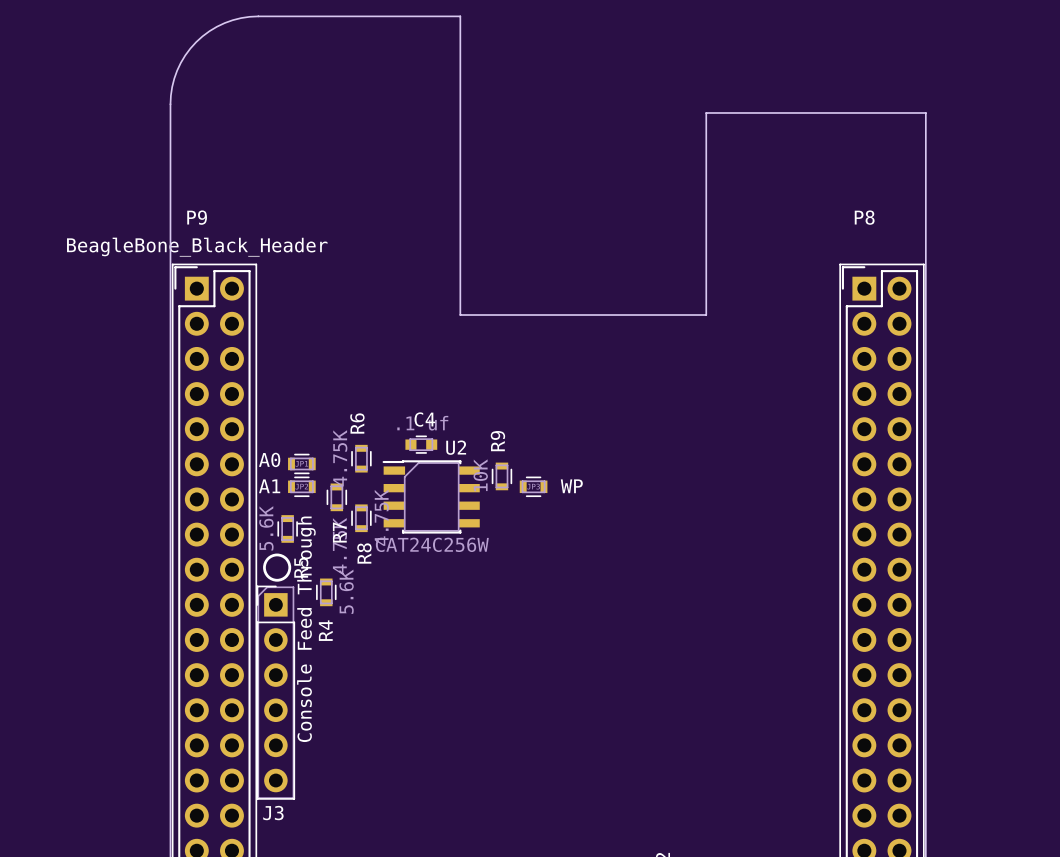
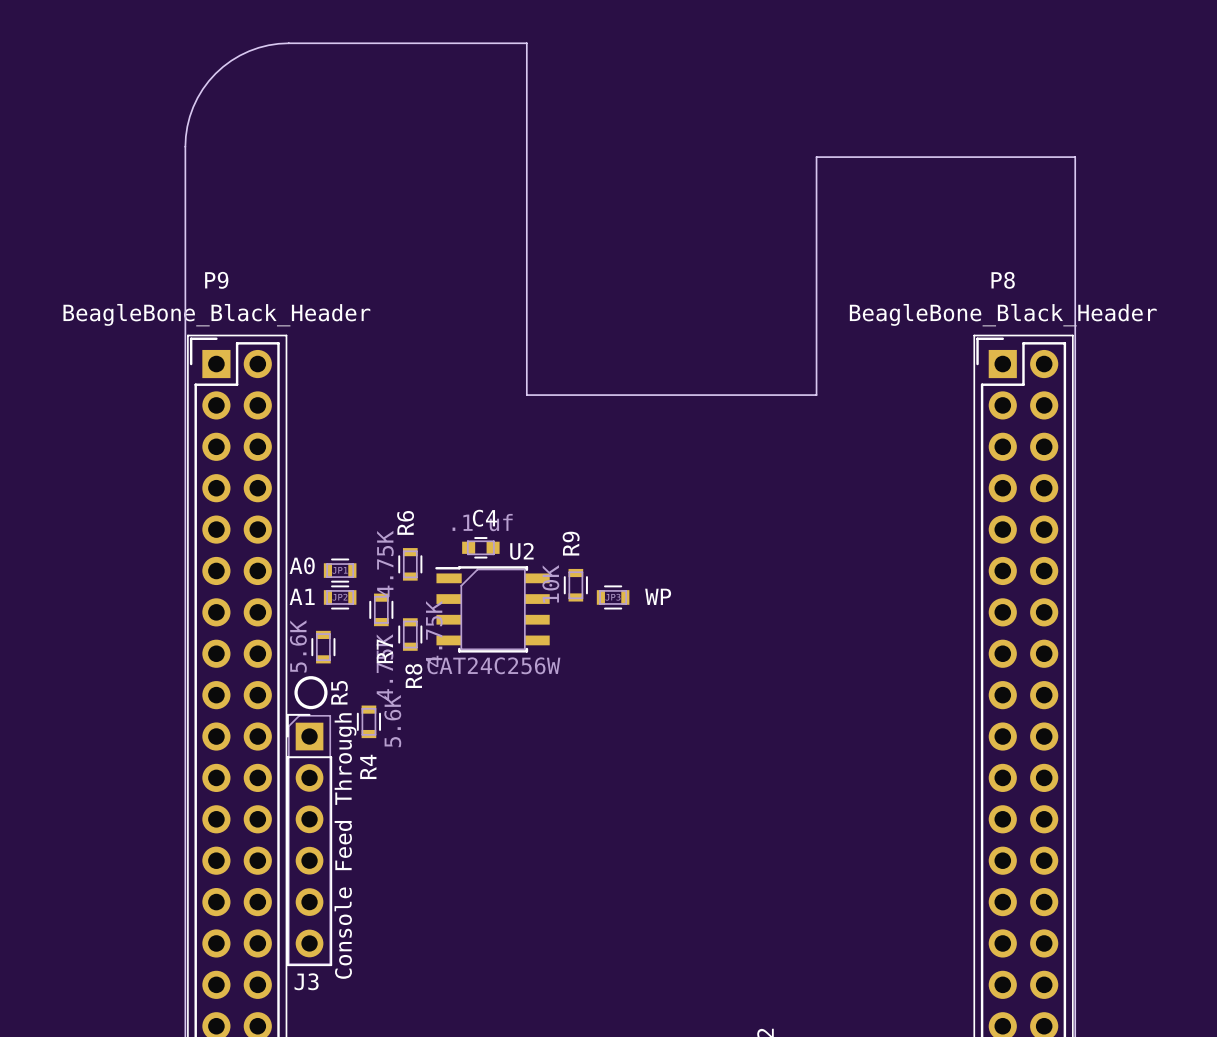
P8 value: none -> BeagleBone_Black_Header (1003, 315)
J3 value position: Console Feed Through (306, 629) -> Console Feed Through (345, 846)

